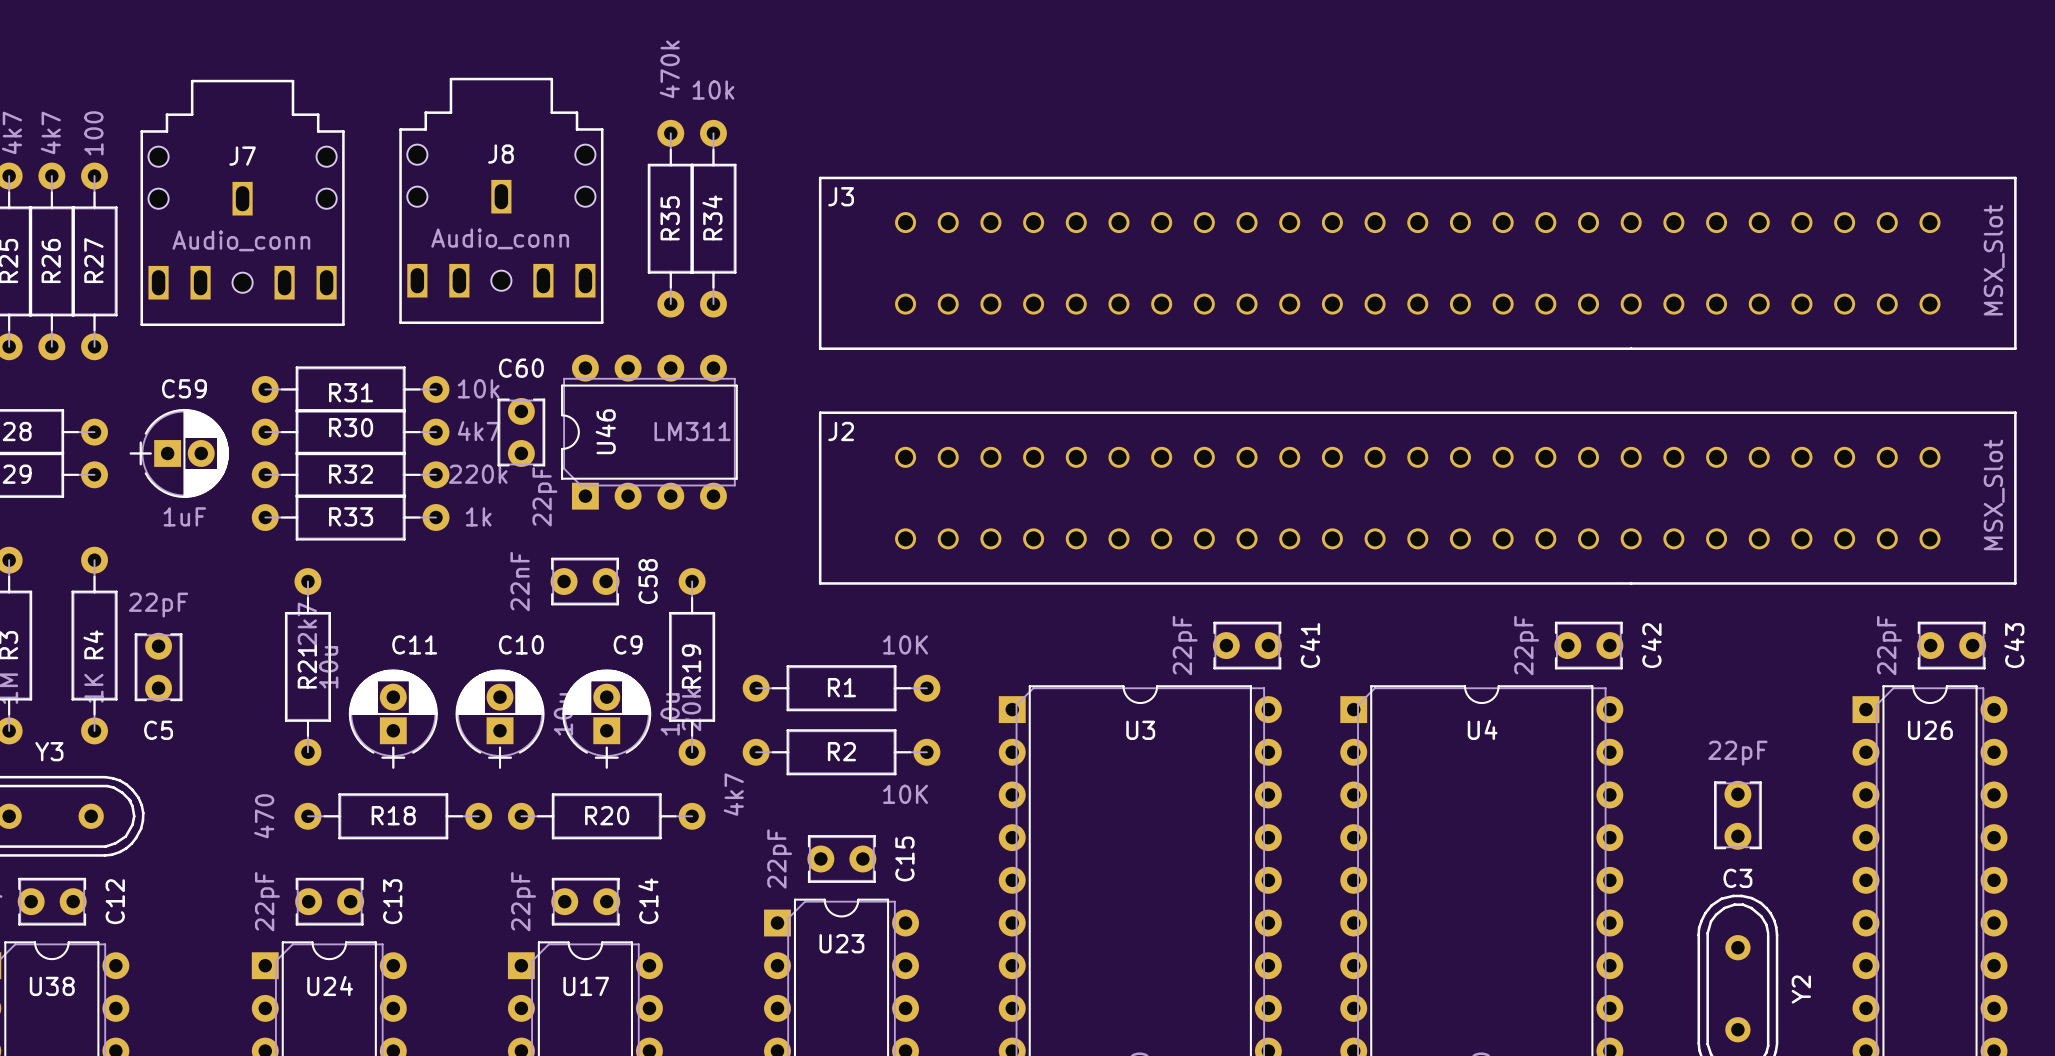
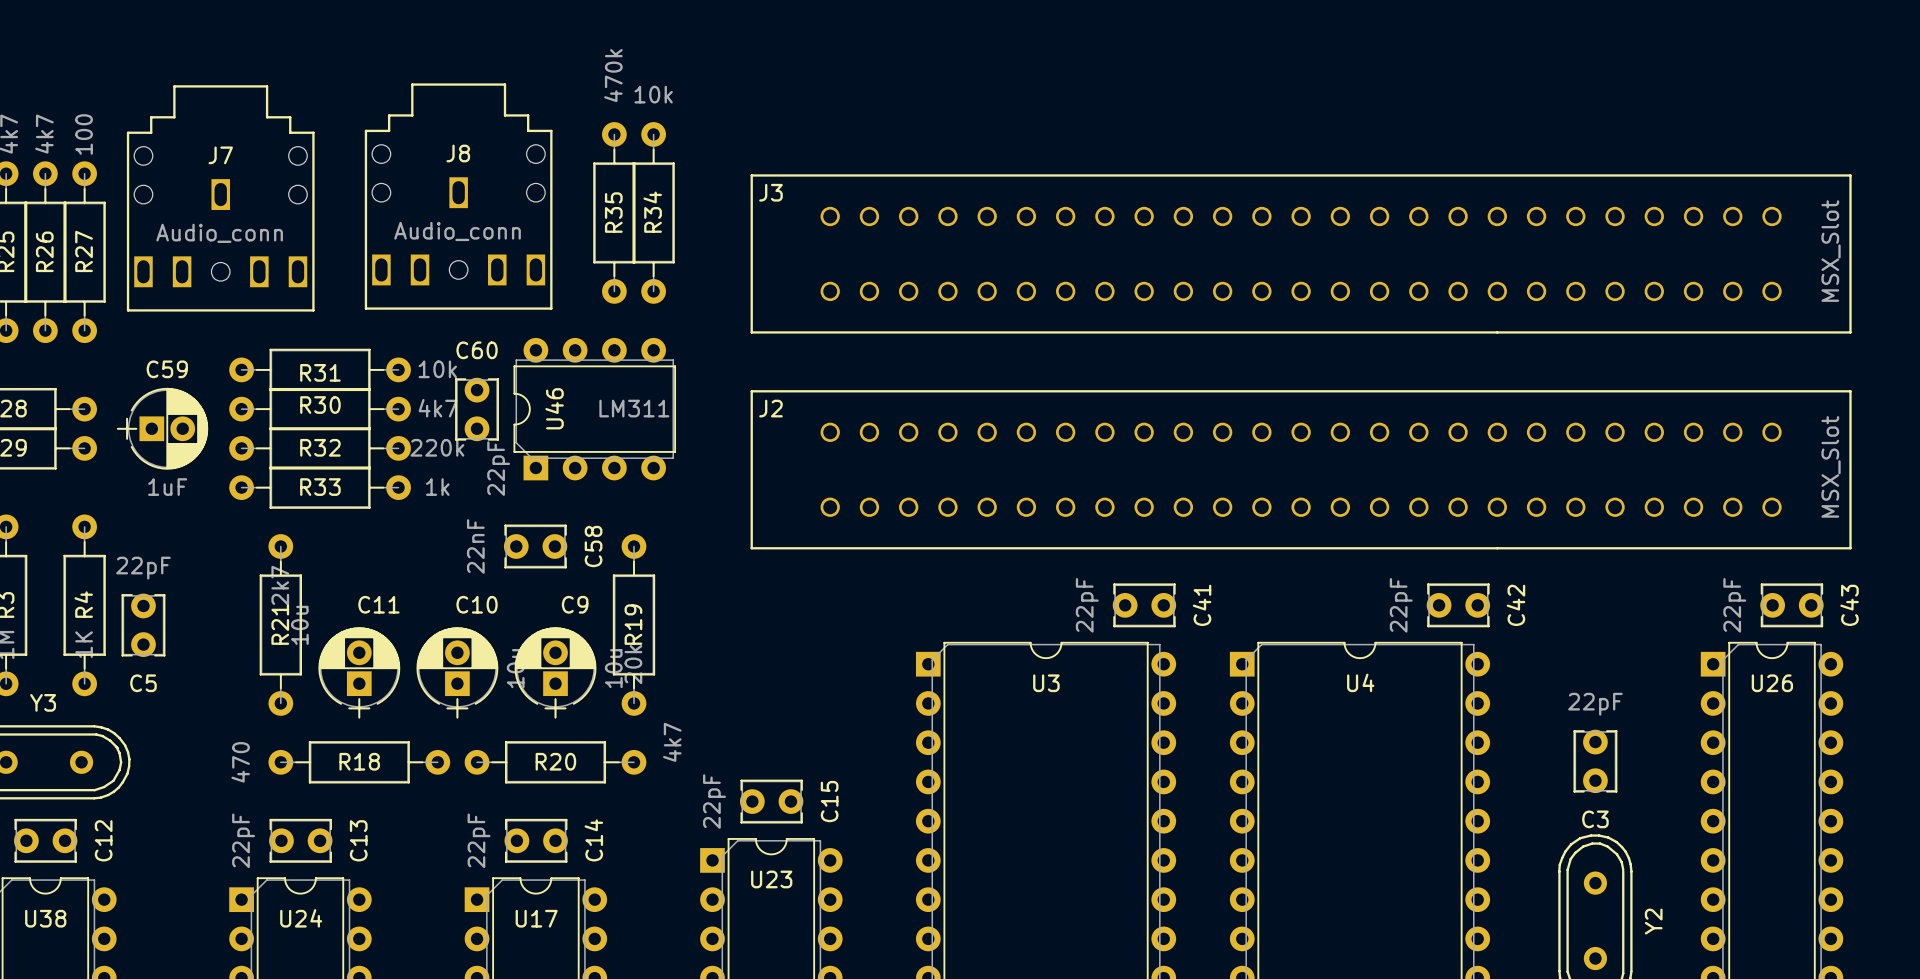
R1: 10K (841, 688) -> none
R2: 10K (841, 752) -> none

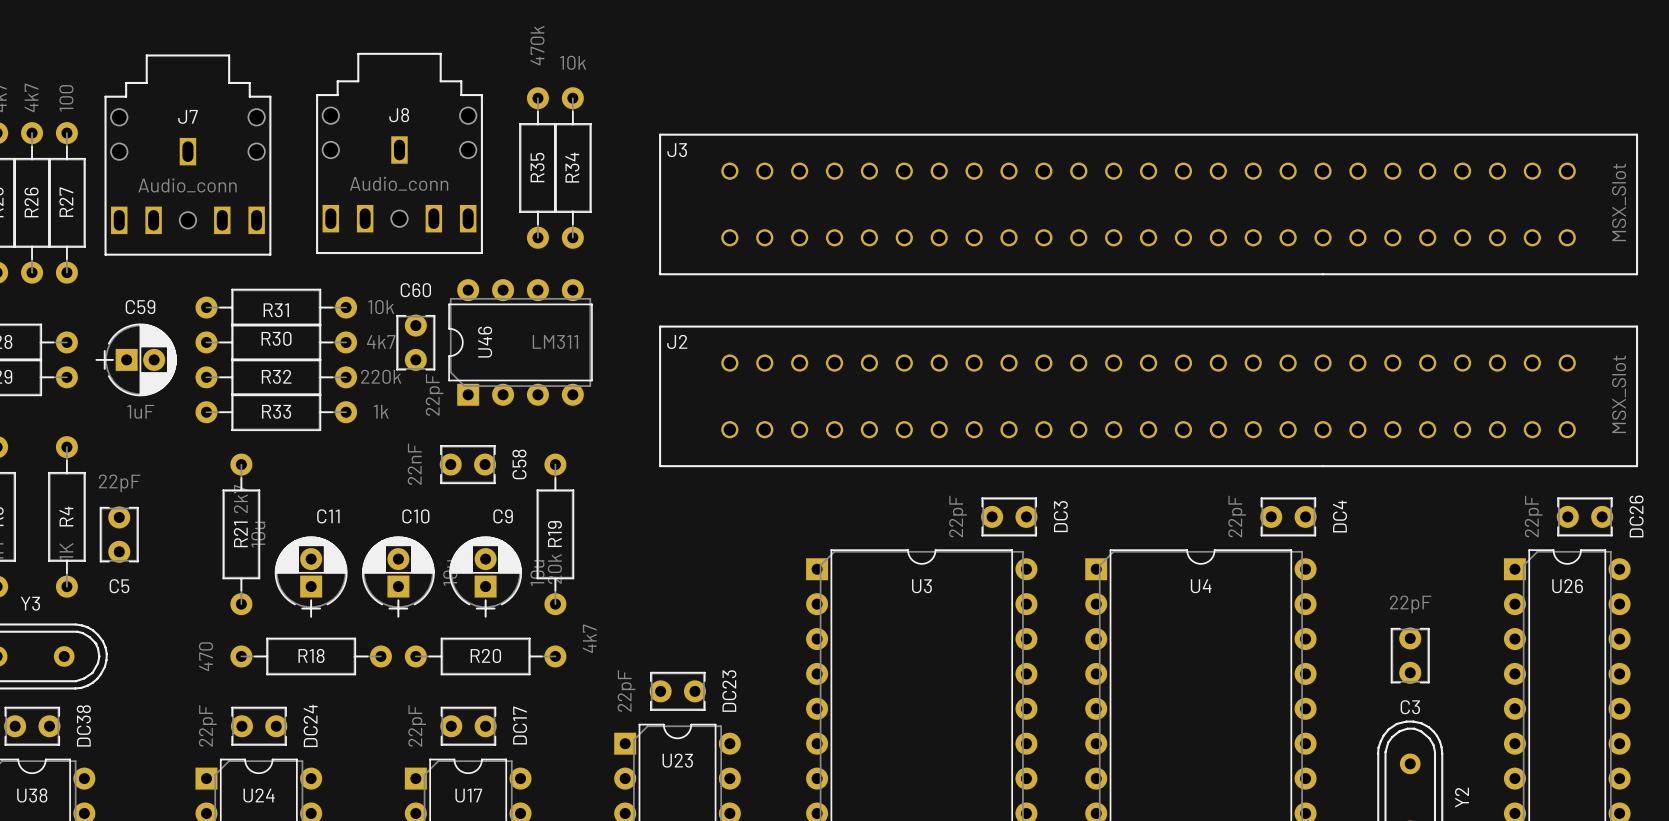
C41 name: C41 (1202, 605) -> DC3 (1060, 516)
C42 name: C42 (1516, 605) -> DC4 (1339, 516)
C43 name: C43 (1849, 605) -> DC26 (1636, 516)
C15 name: C15 (829, 801) -> DC23 (729, 691)
C12 name: C12 (103, 840) -> DC38 (83, 725)
C13 name: C13 (358, 840) -> DC24 (310, 725)
C14 name: C14 (593, 840) -> DC17 (520, 725)

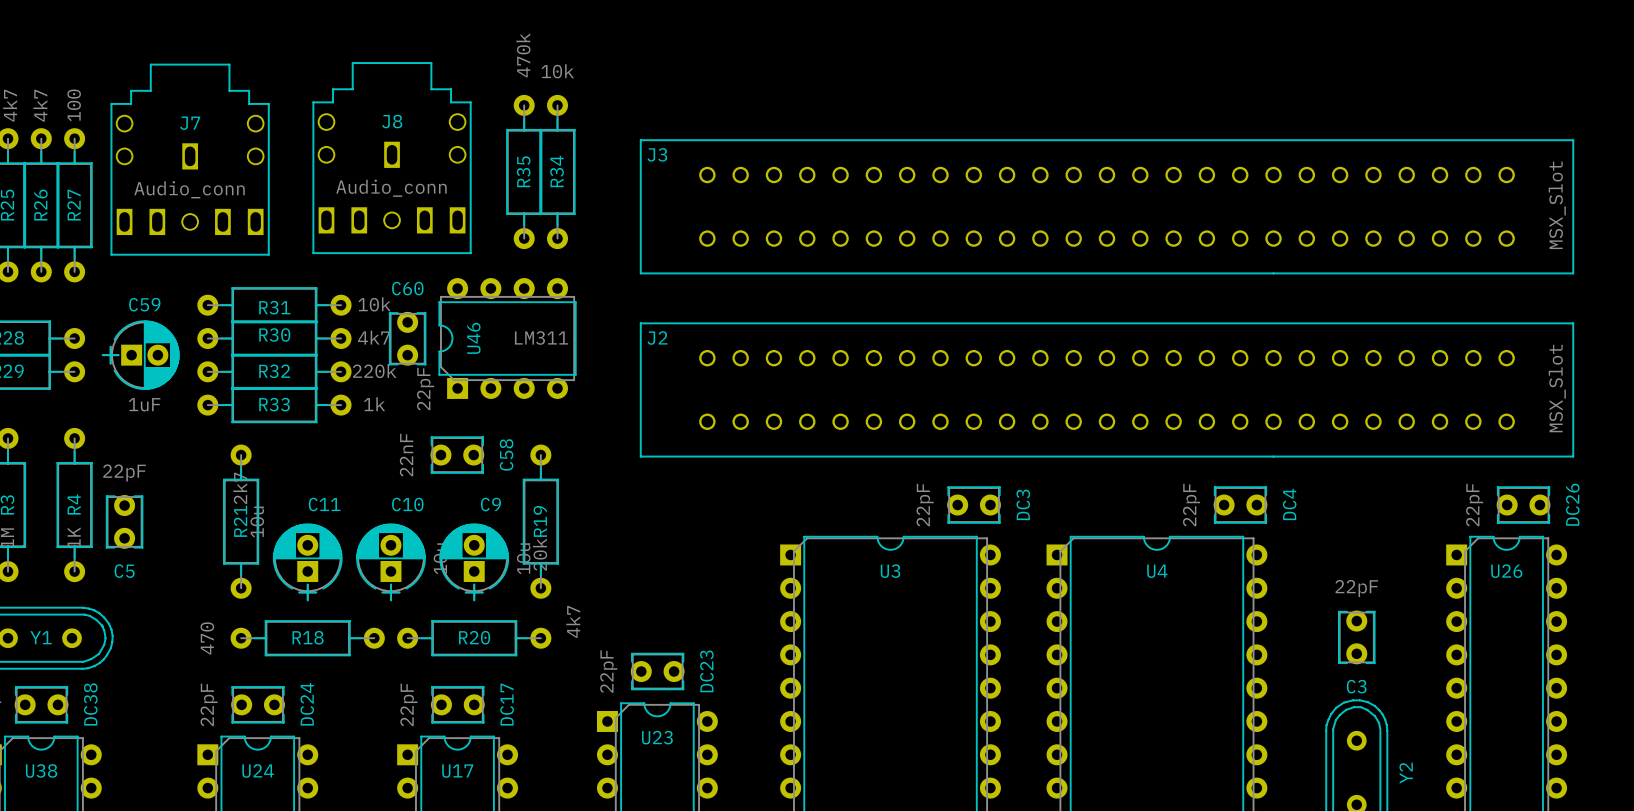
Y3 name: Y3 (30, 603) -> Y1 (41, 637)

